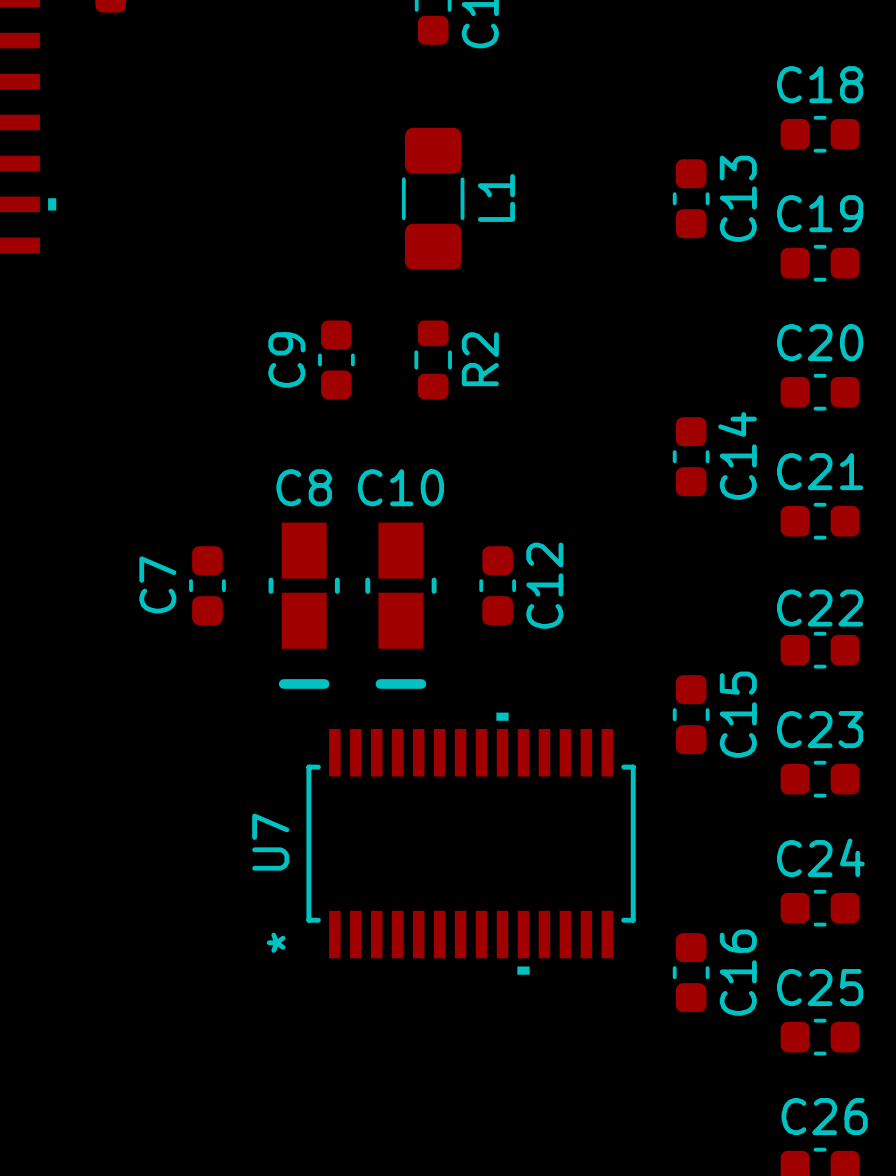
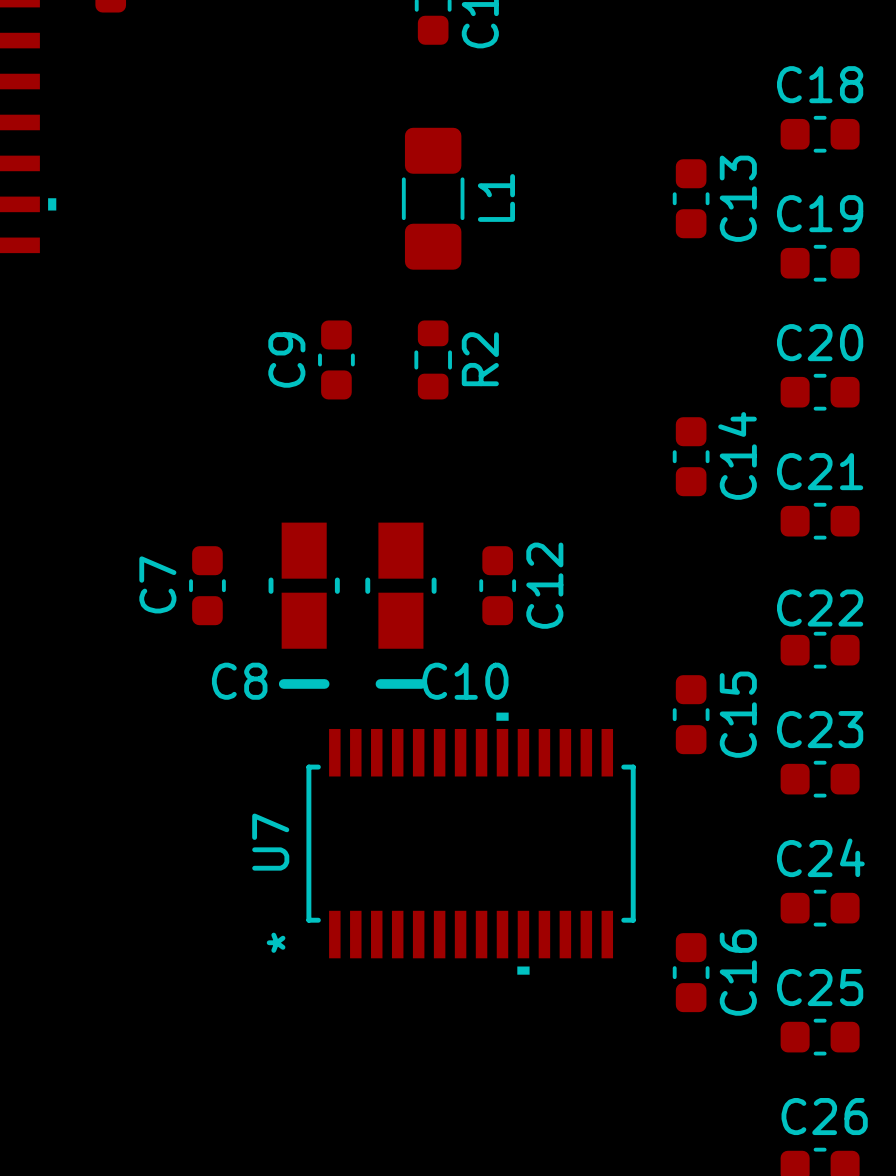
C8 name position: C8 (304, 487) -> C8 (239, 681)
C10 name position: C10 (400, 487) -> C10 (465, 681)

